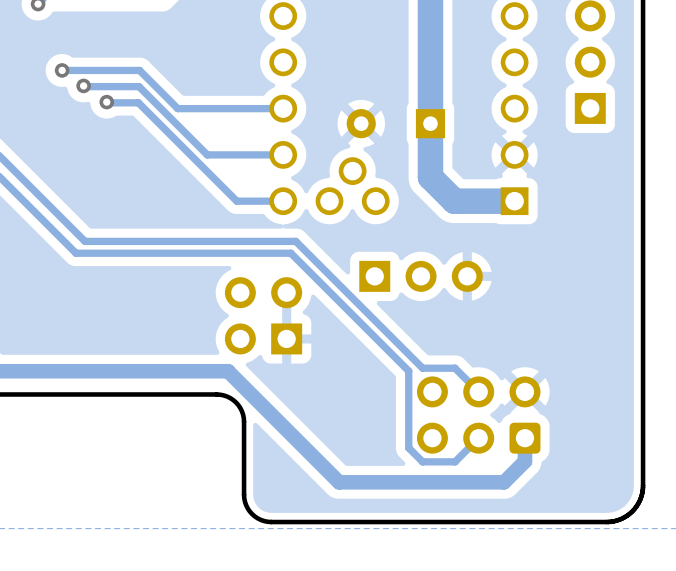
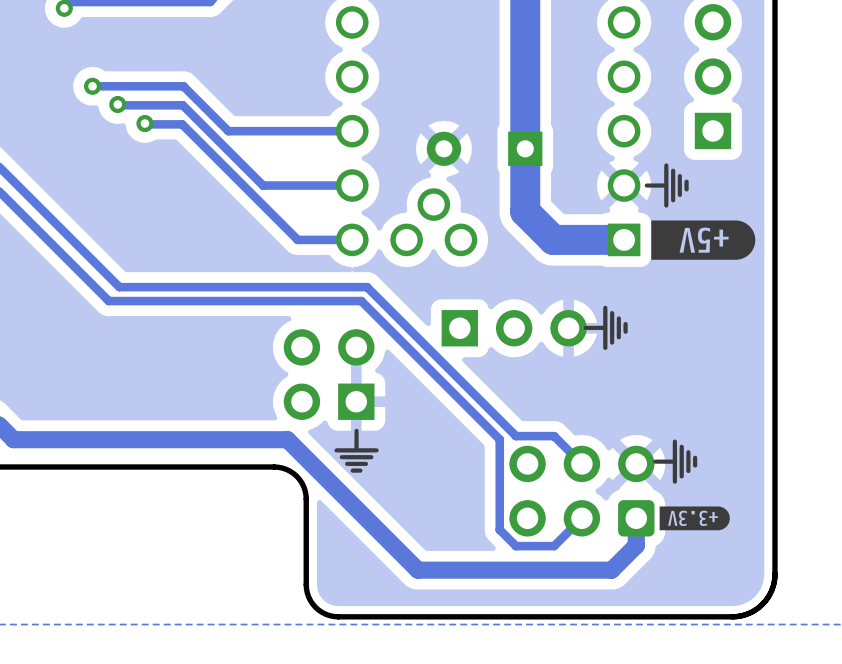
drawing: none -> [644, 163, 756, 260]
drawing: none -> [583, 305, 628, 350]
drawing: none -> [334, 428, 379, 473]
drawing: none -> [653, 439, 730, 531]

